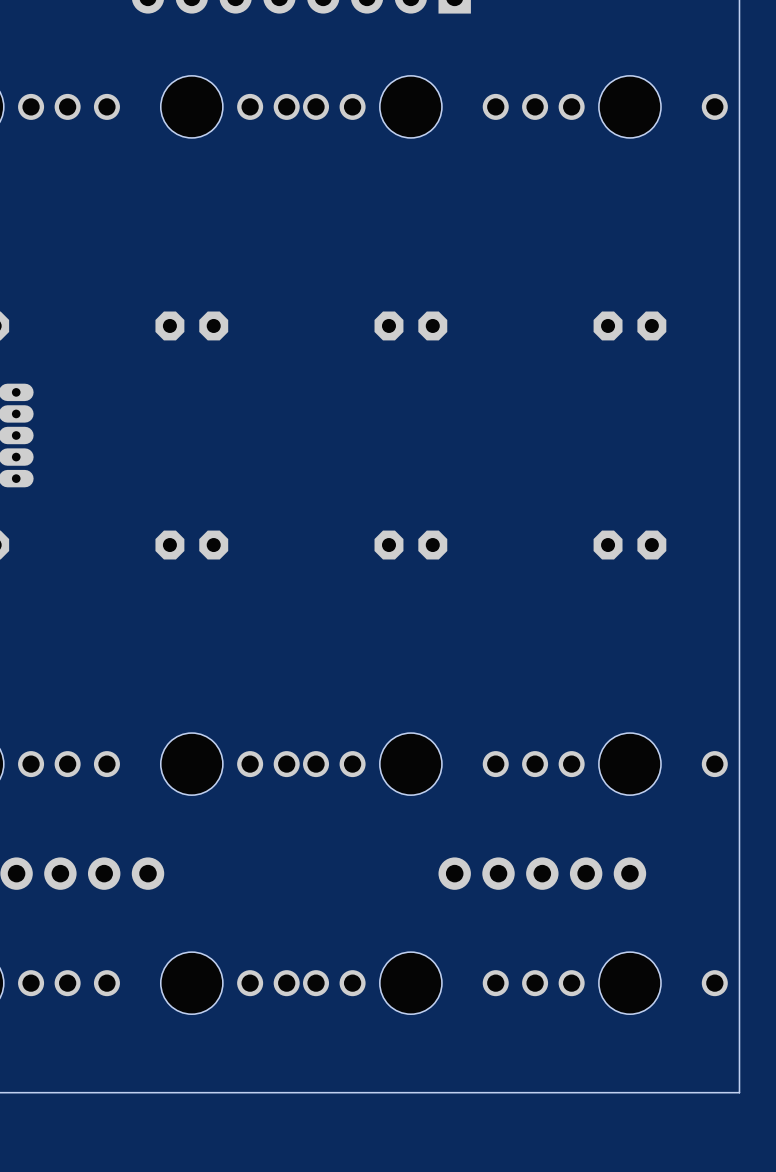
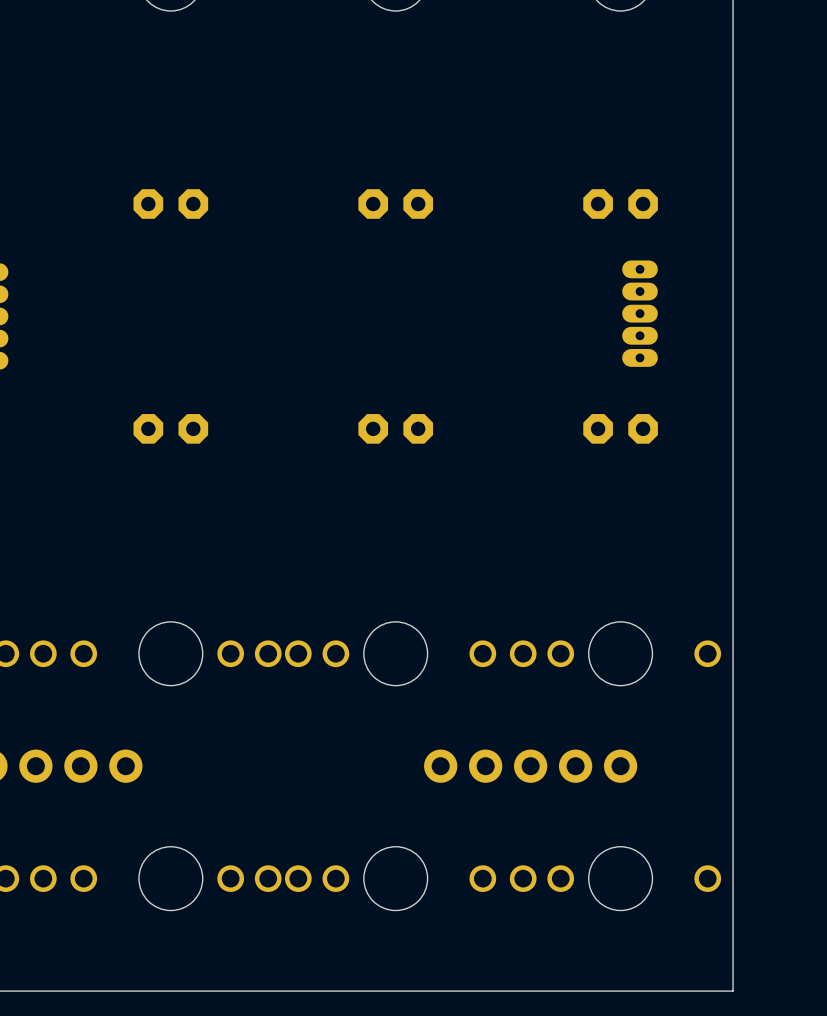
part: none -> (640, 313)

